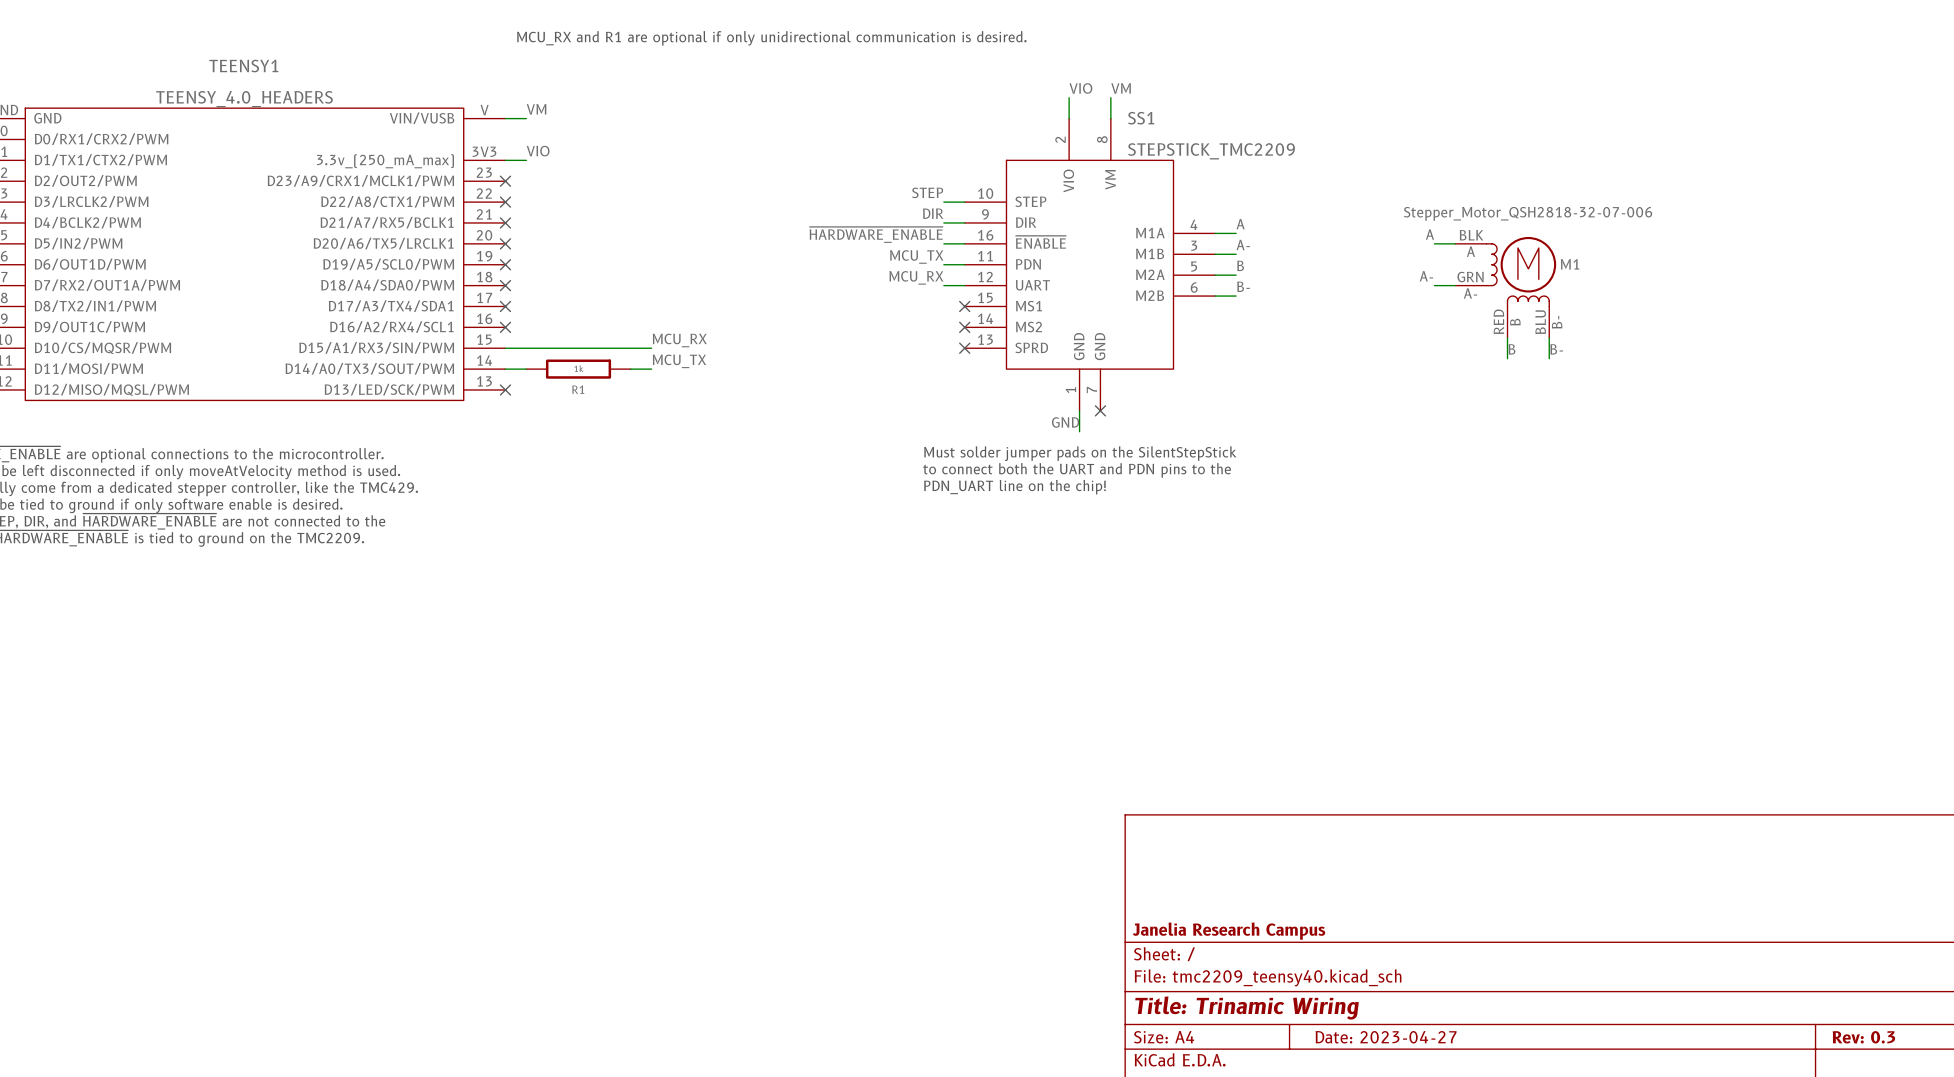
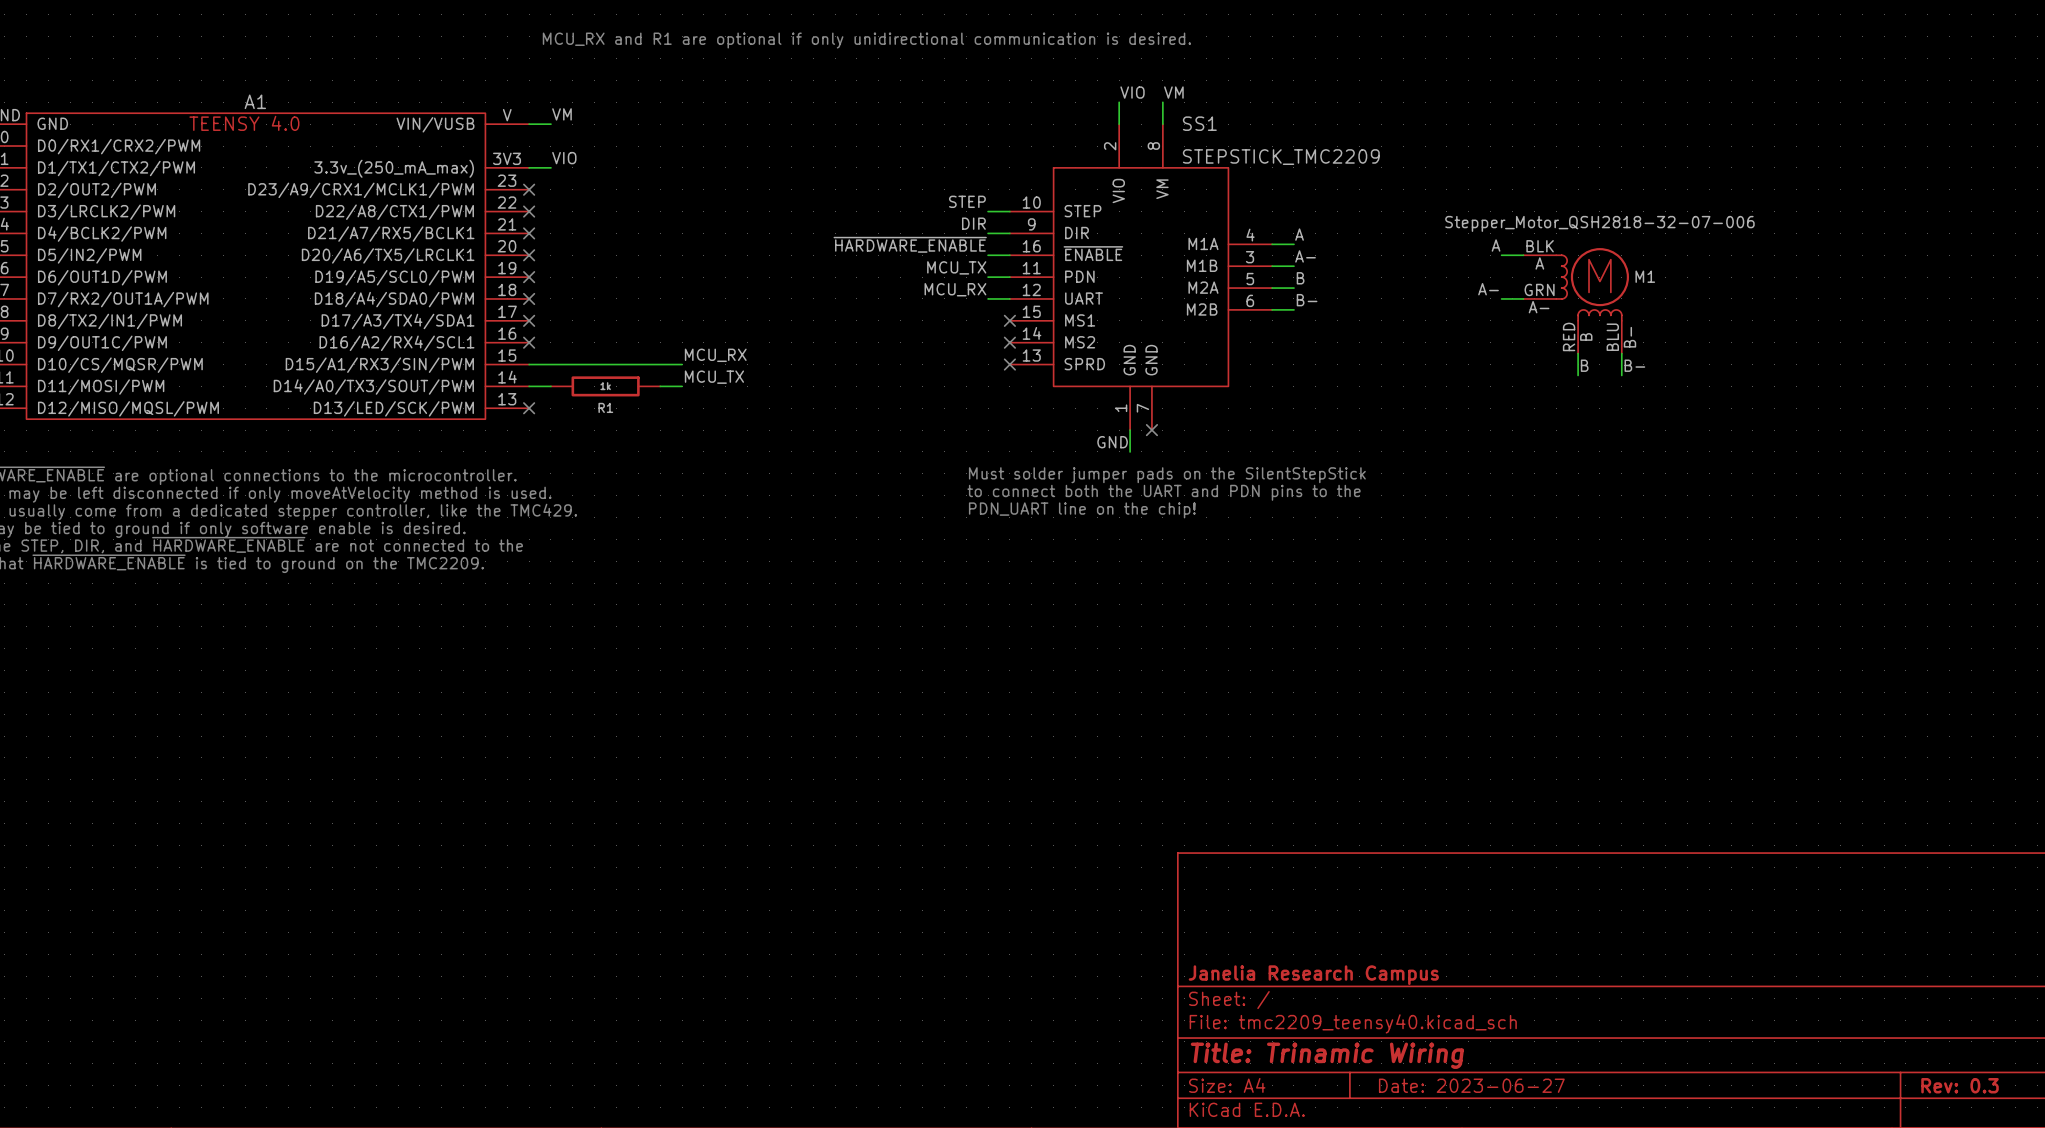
TEENSY1 name: TEENSY1 (243, 66) -> A1 (255, 101)
TEENSY1 value: TEENSY_4.0_HEADERS (244, 99) -> none
TEENSY1 text: none -> TEENSY 4.0 (244, 123)
title block: Date: 2023-04-27 (1386, 1037) -> Date: 2023-06-27 (1471, 1085)

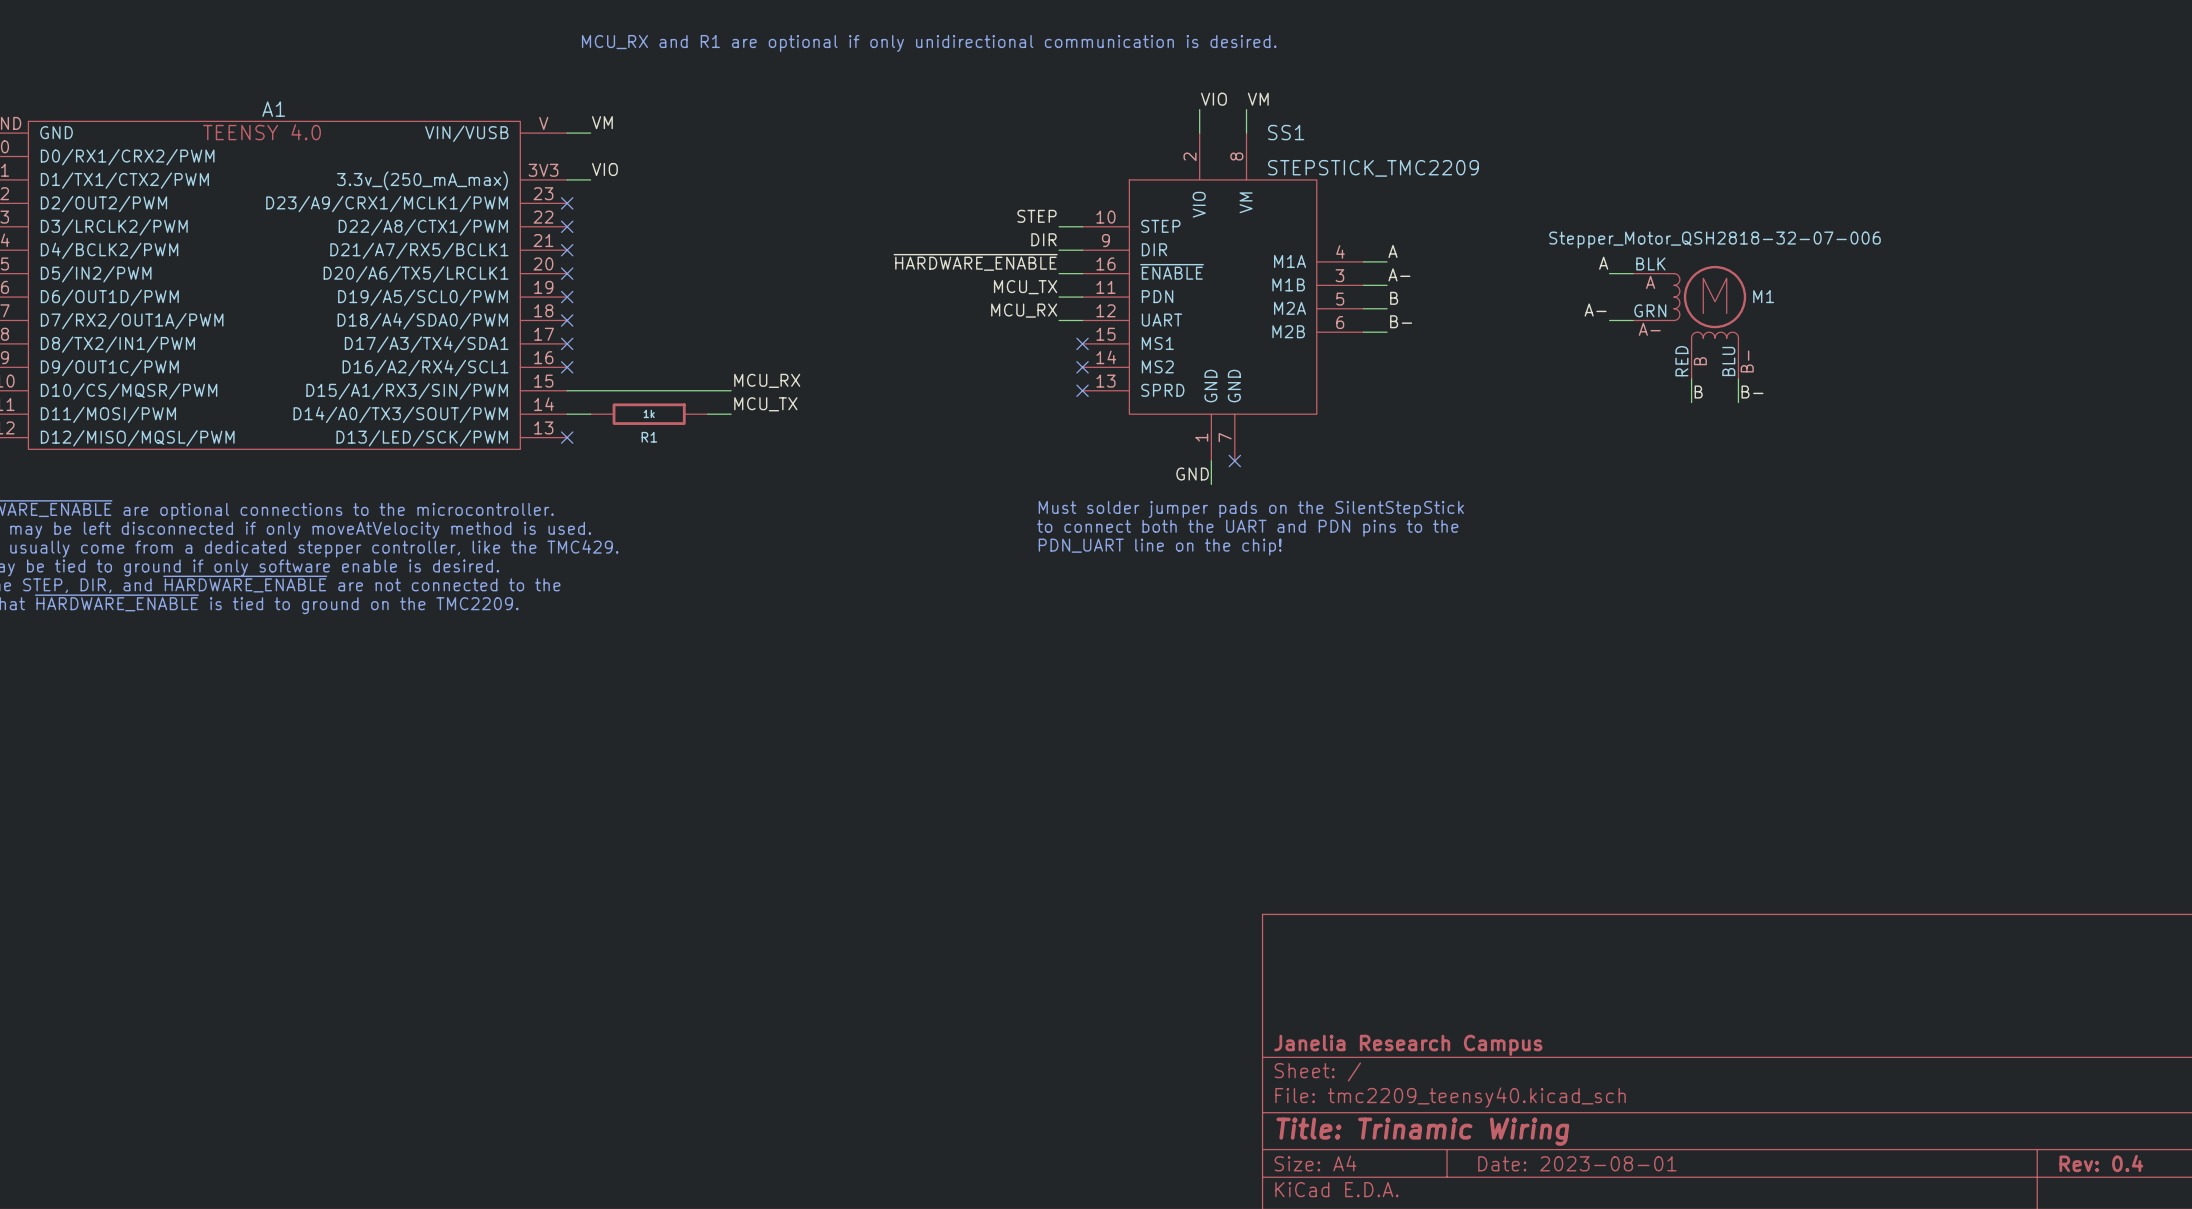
title block: Date: 2023-06-27 (1471, 1085) -> Date: 2023-08-01 (1577, 1163)
title block: Rev: 0.3 (1960, 1085) -> Rev: 0.4 (2101, 1163)

